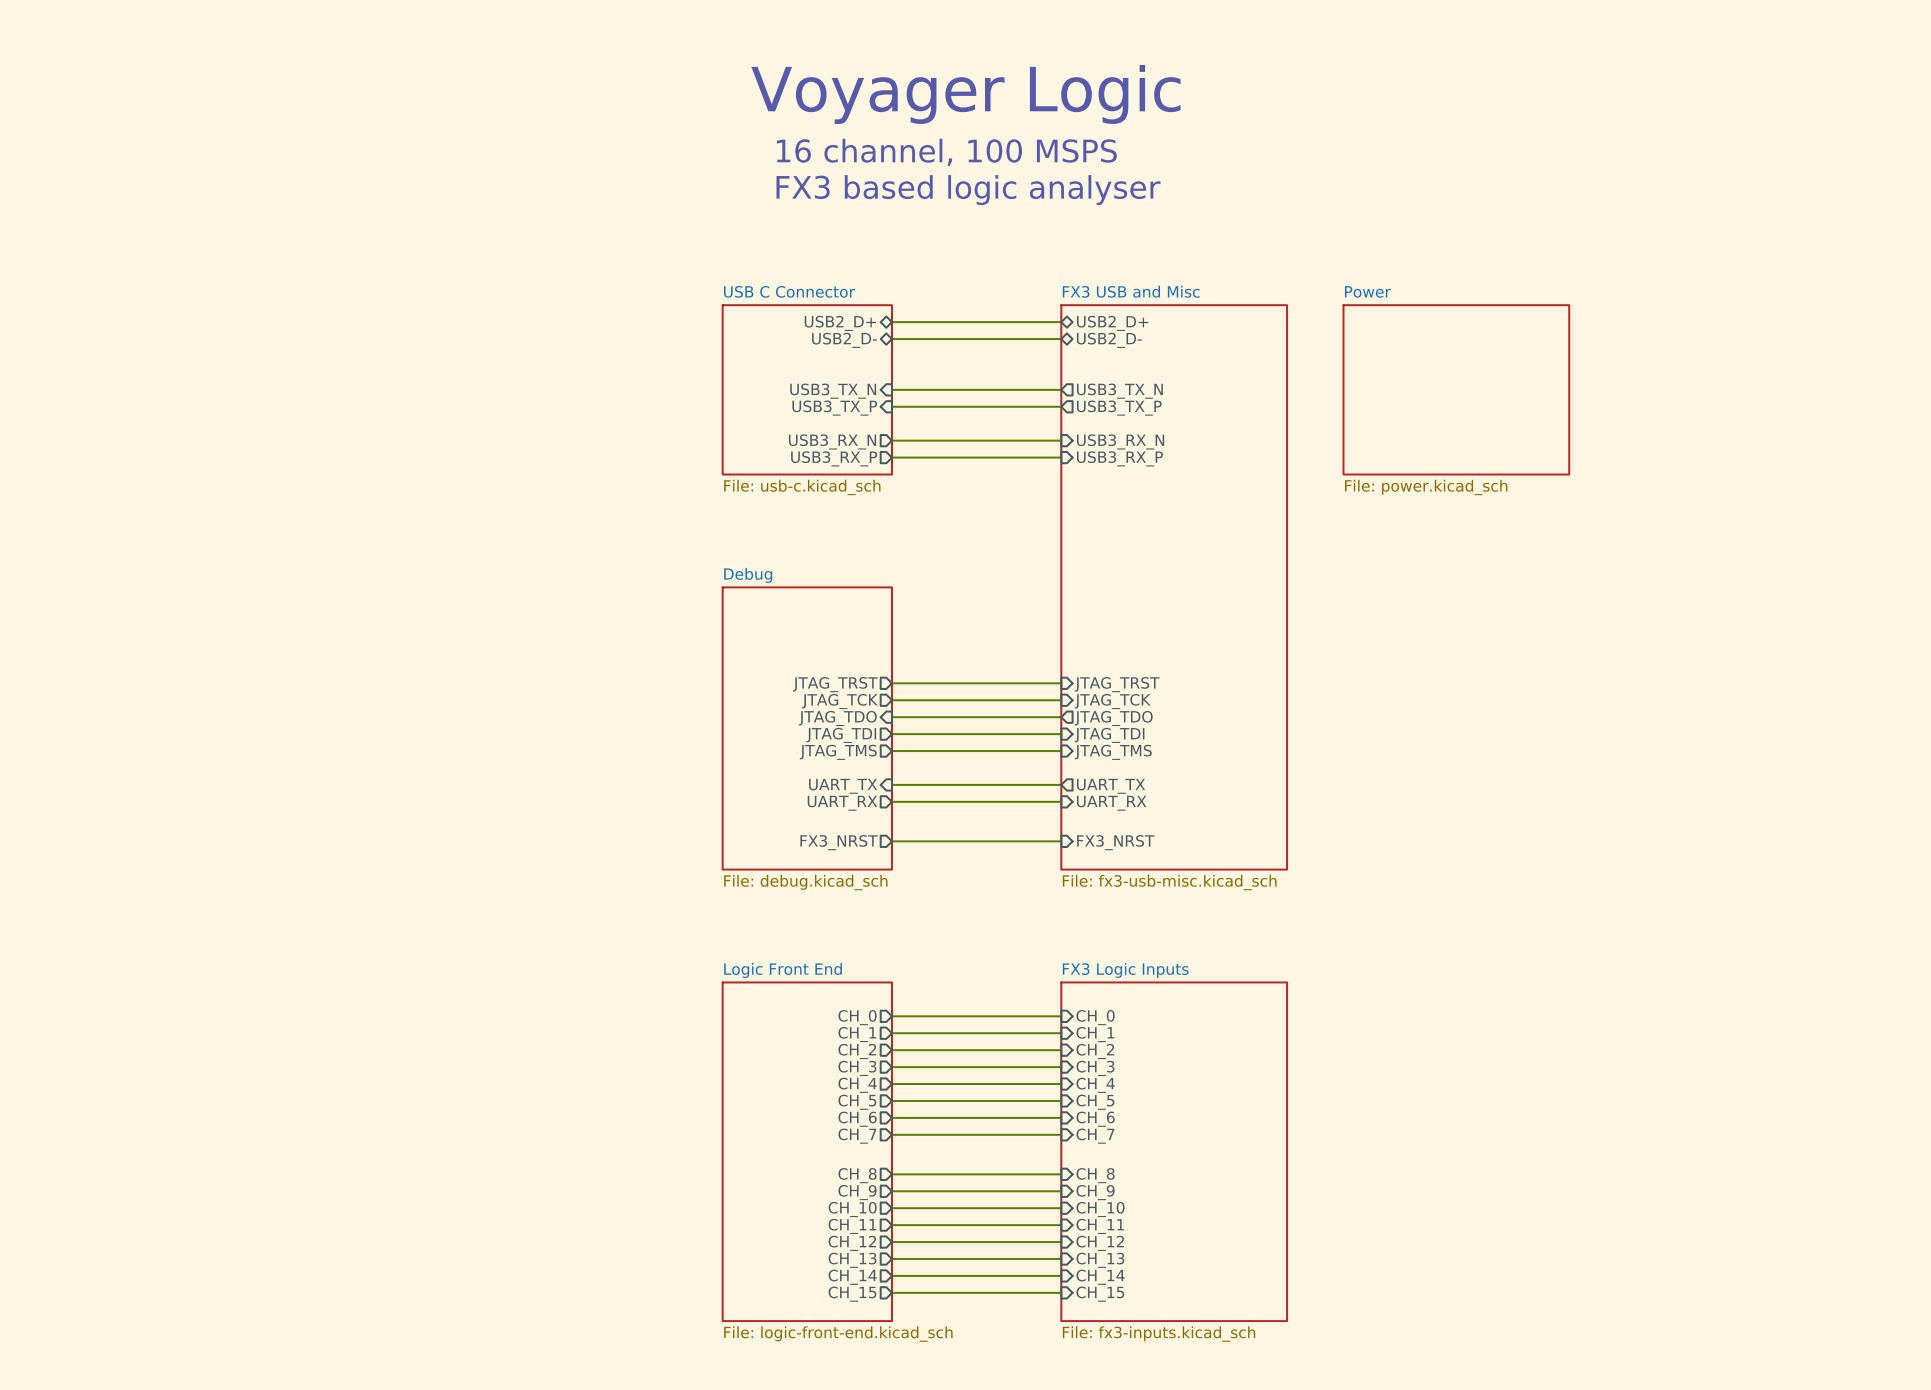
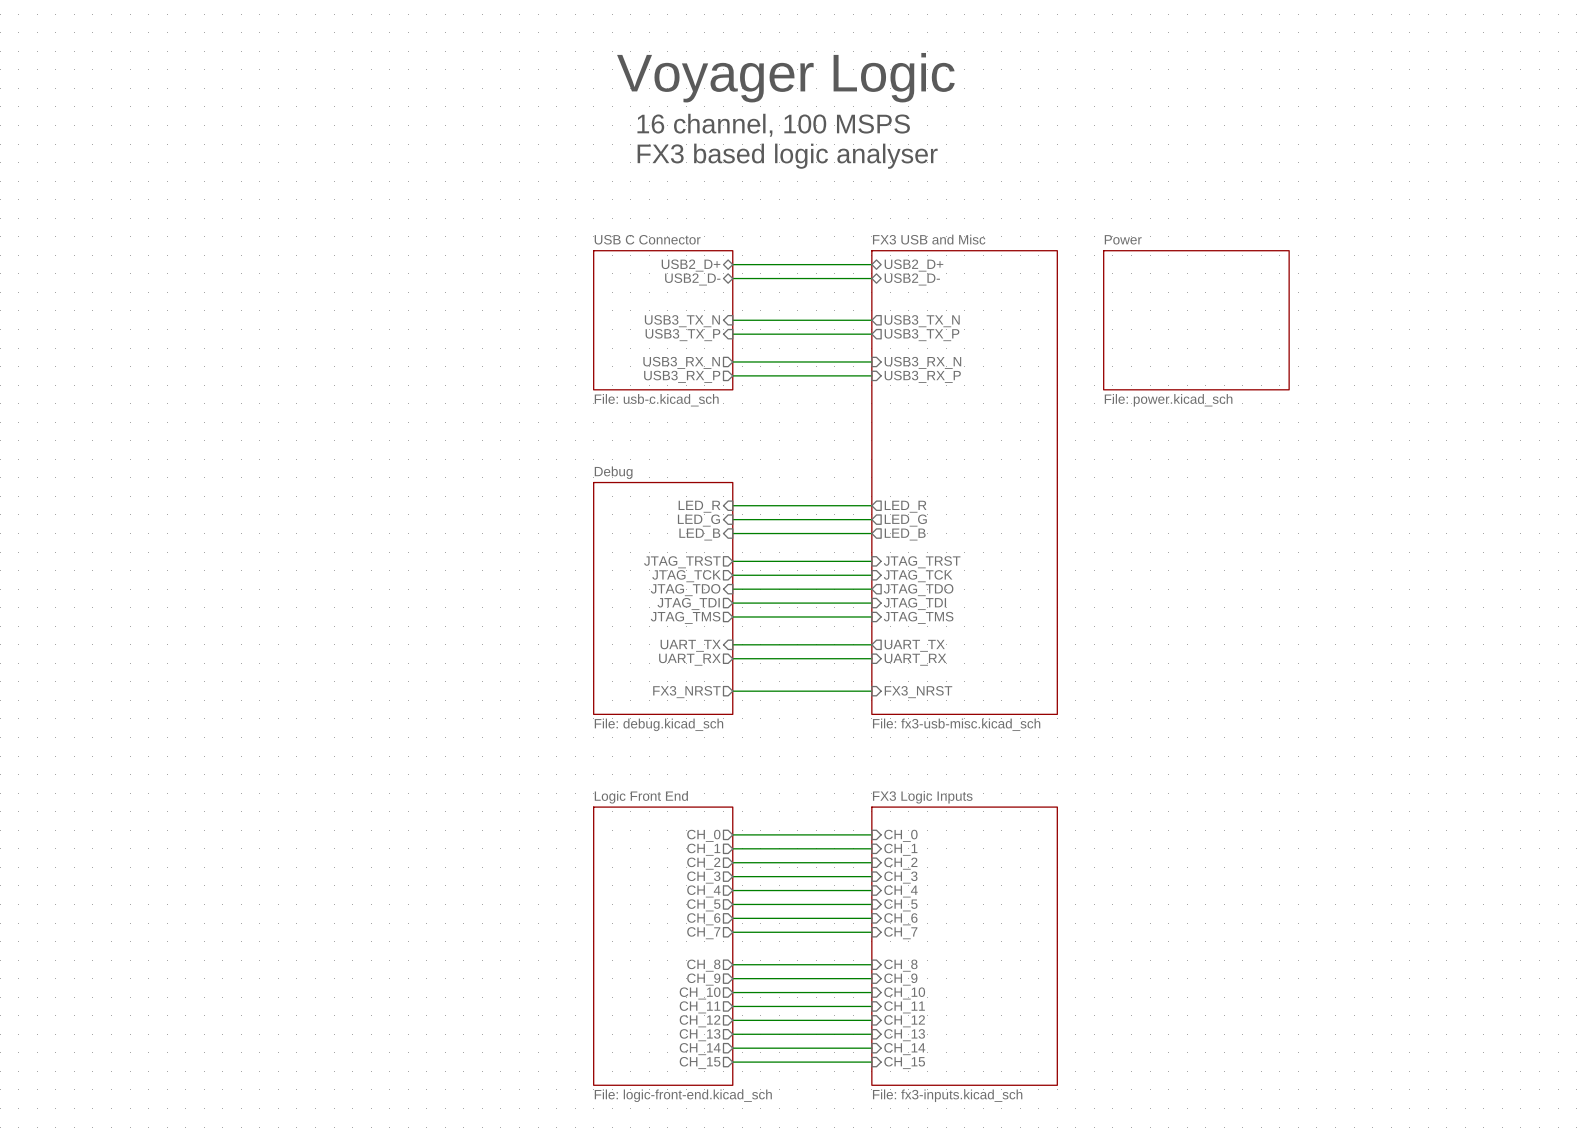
wire: none -> (732, 505) (871, 505)
sheet pin: none -> LED_R (699, 506)
sheet pin: none -> LED_R (905, 506)
wire: none -> (732, 519) (871, 519)
sheet pin: none -> LED_G (698, 520)
sheet pin: none -> LED_G (905, 520)
wire: none -> (732, 533) (871, 533)
sheet pin: none -> LED_B (699, 534)
sheet pin: none -> LED_B (905, 534)

